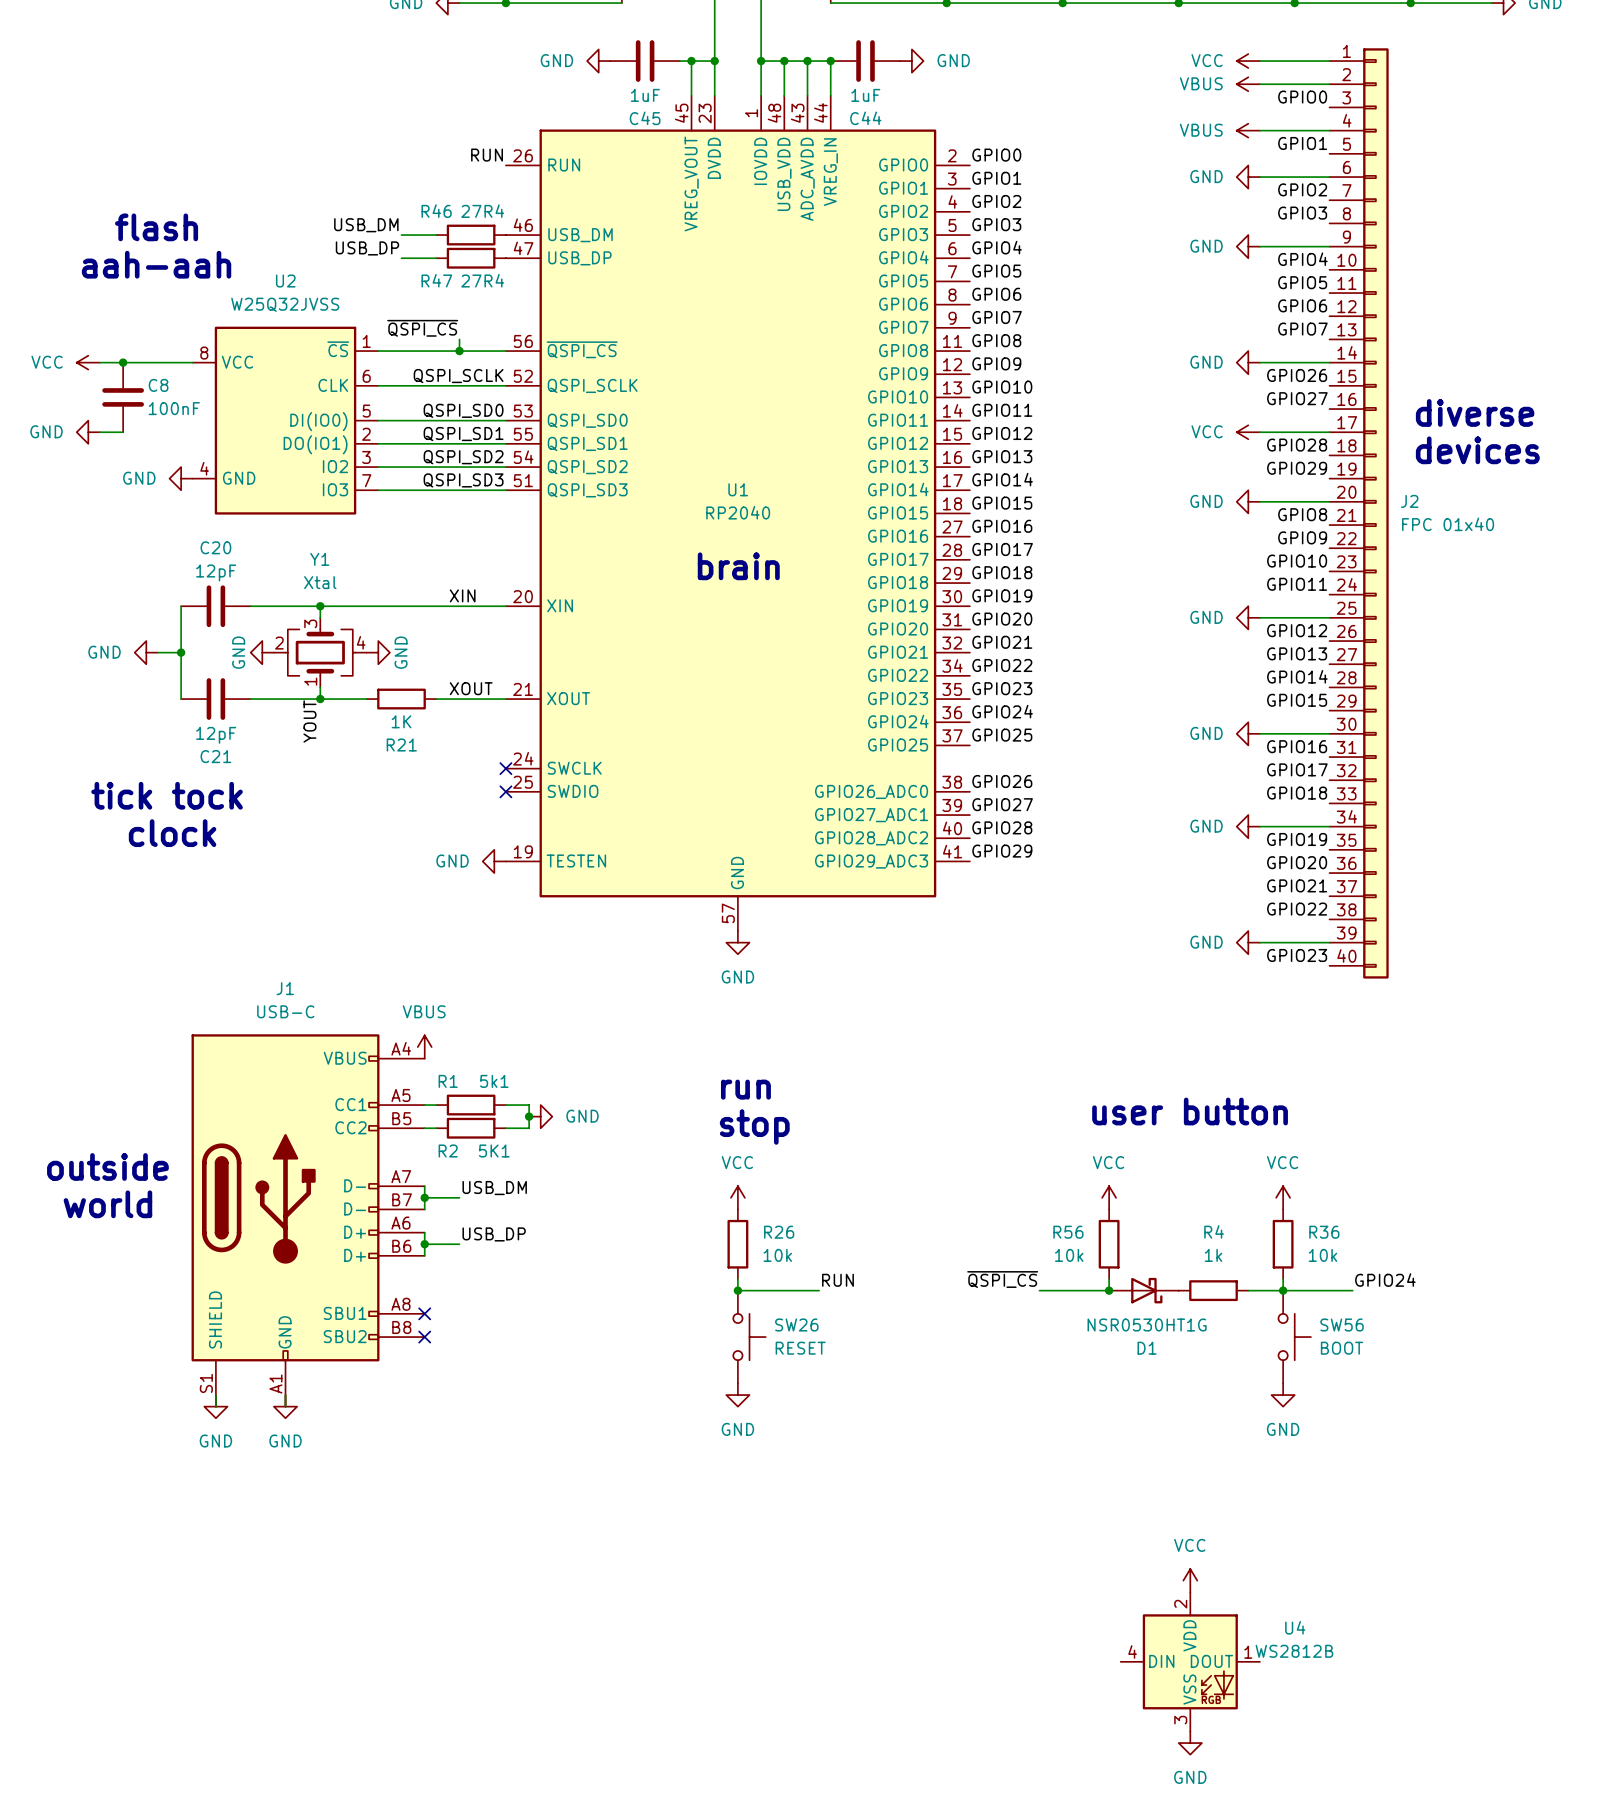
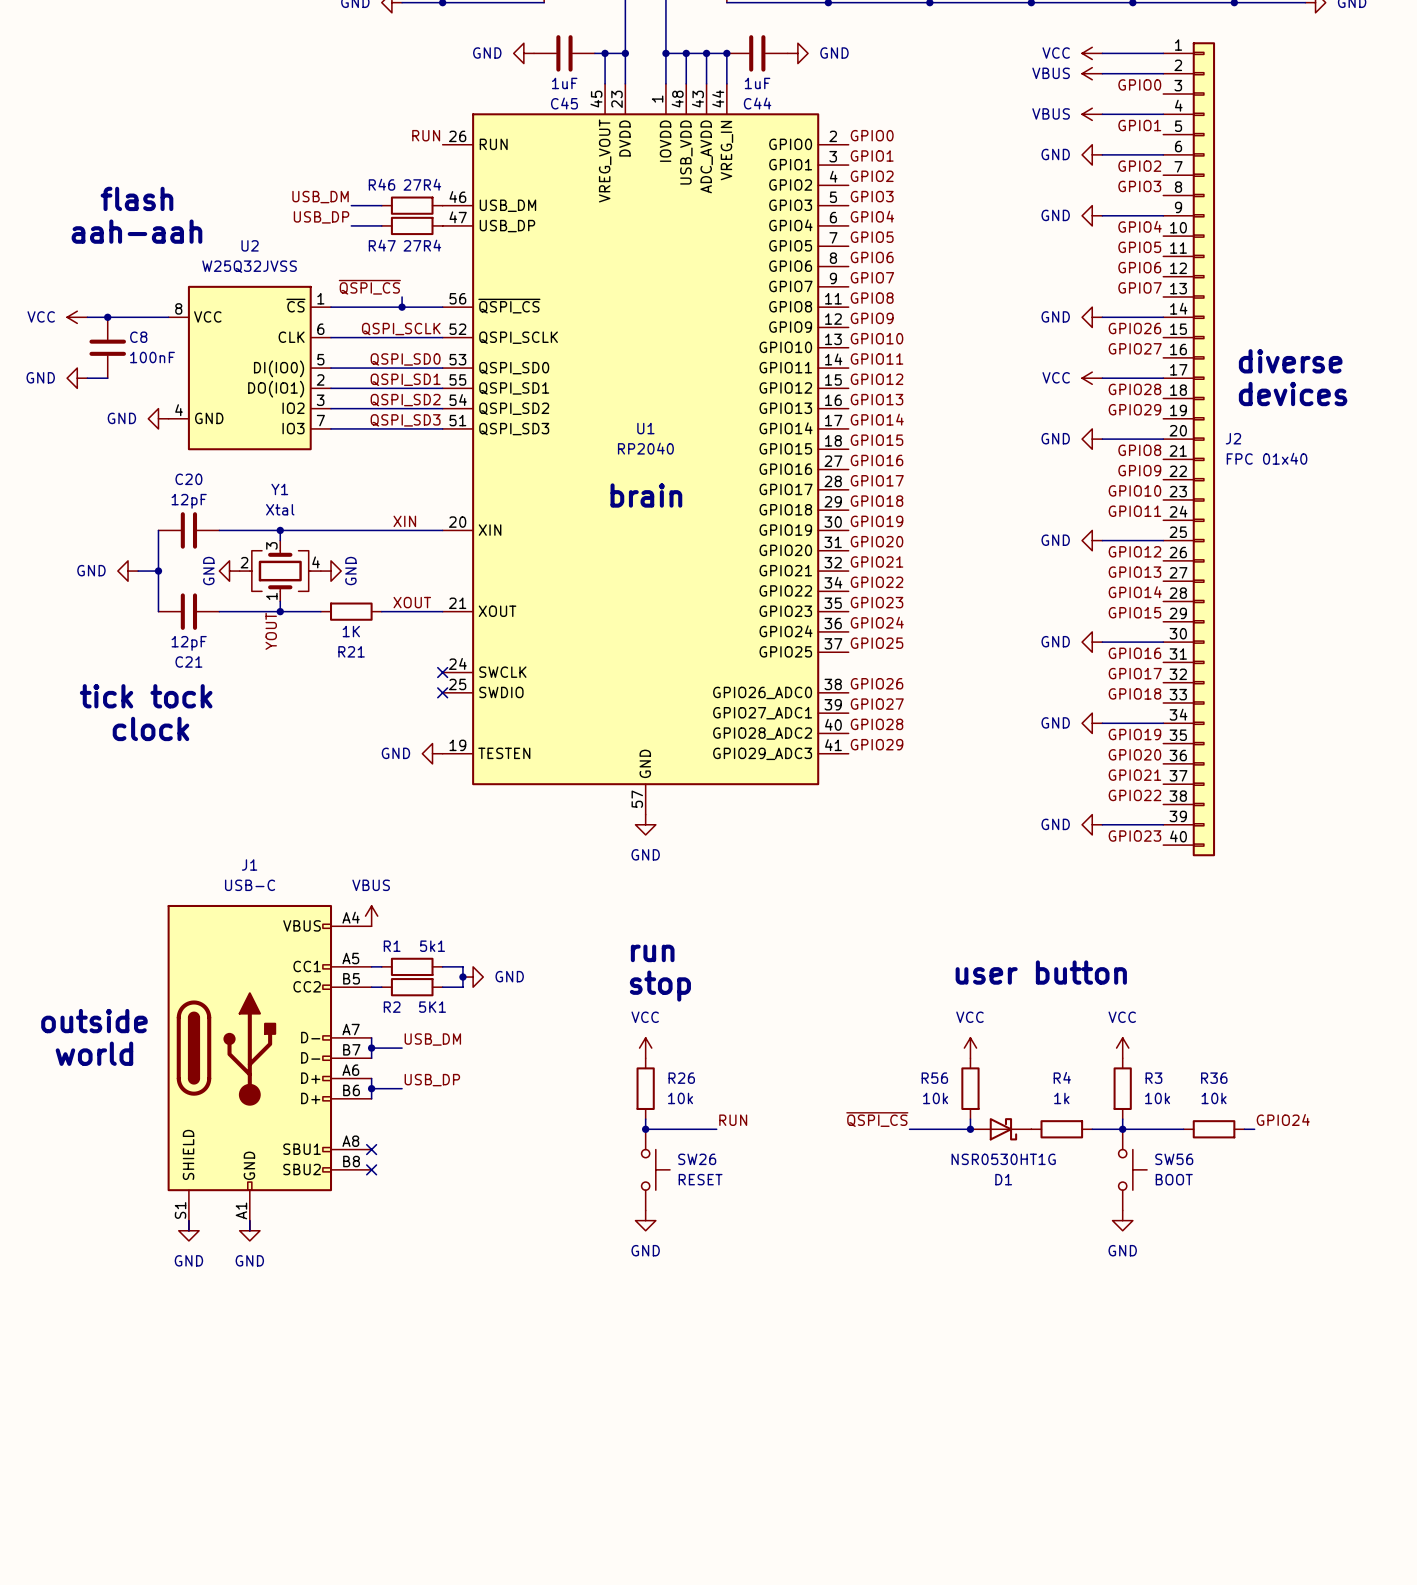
R36 name: R36 (1324, 1232) -> R3 (1153, 1078)
label position: GPIO24 (1385, 1280) -> GPIO24 (1283, 1119)
R36: none -> 10k (1214, 1129)
wire: none -> (1244, 1129) (1254, 1129)
power symbol: VCC (1190, 1580) -> none
U4: WS2812B (1190, 1661) -> none
power symbol: GND (1190, 1743) -> none

